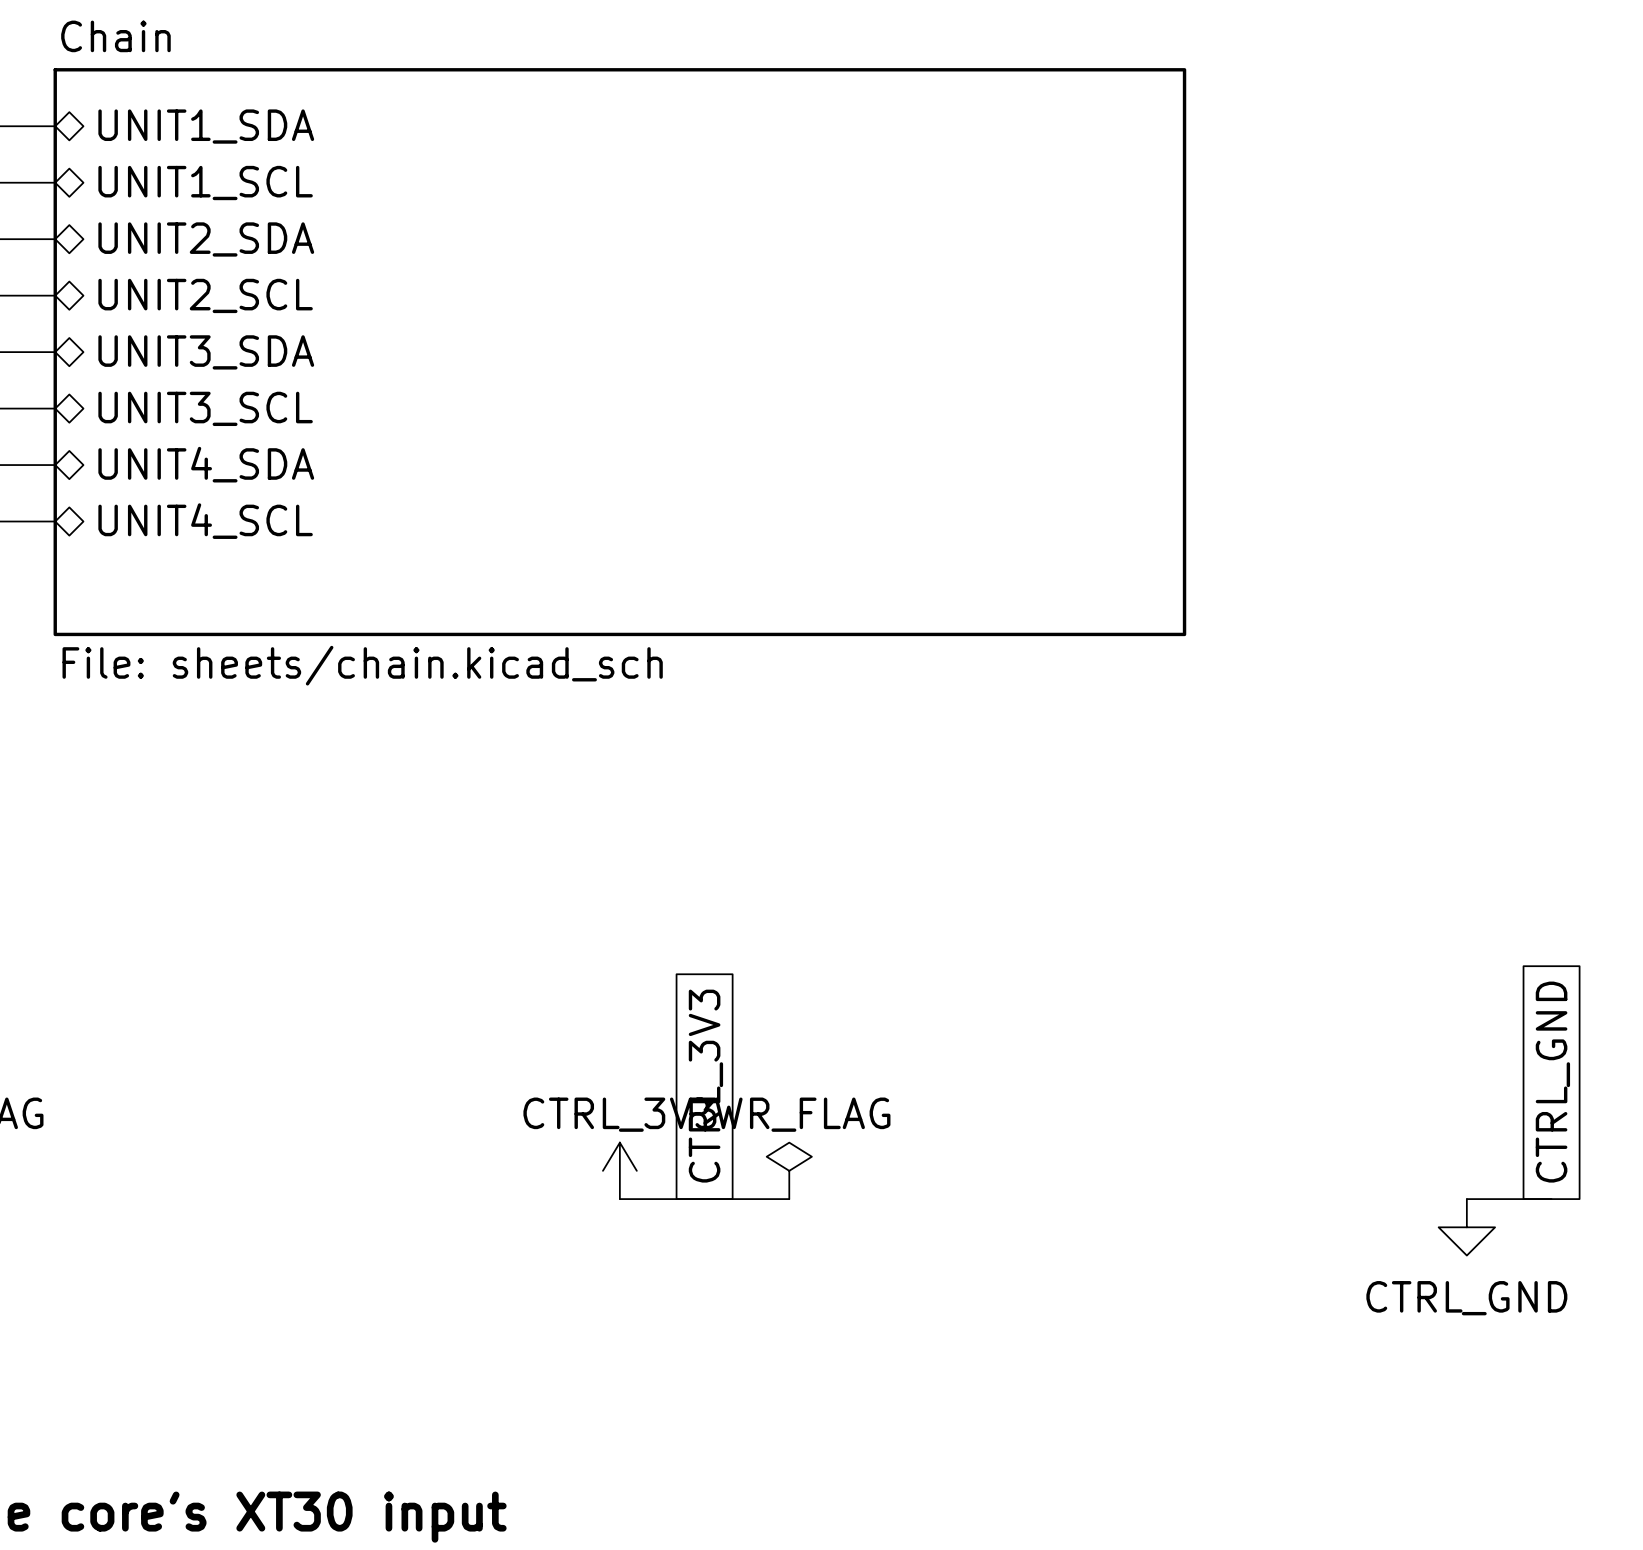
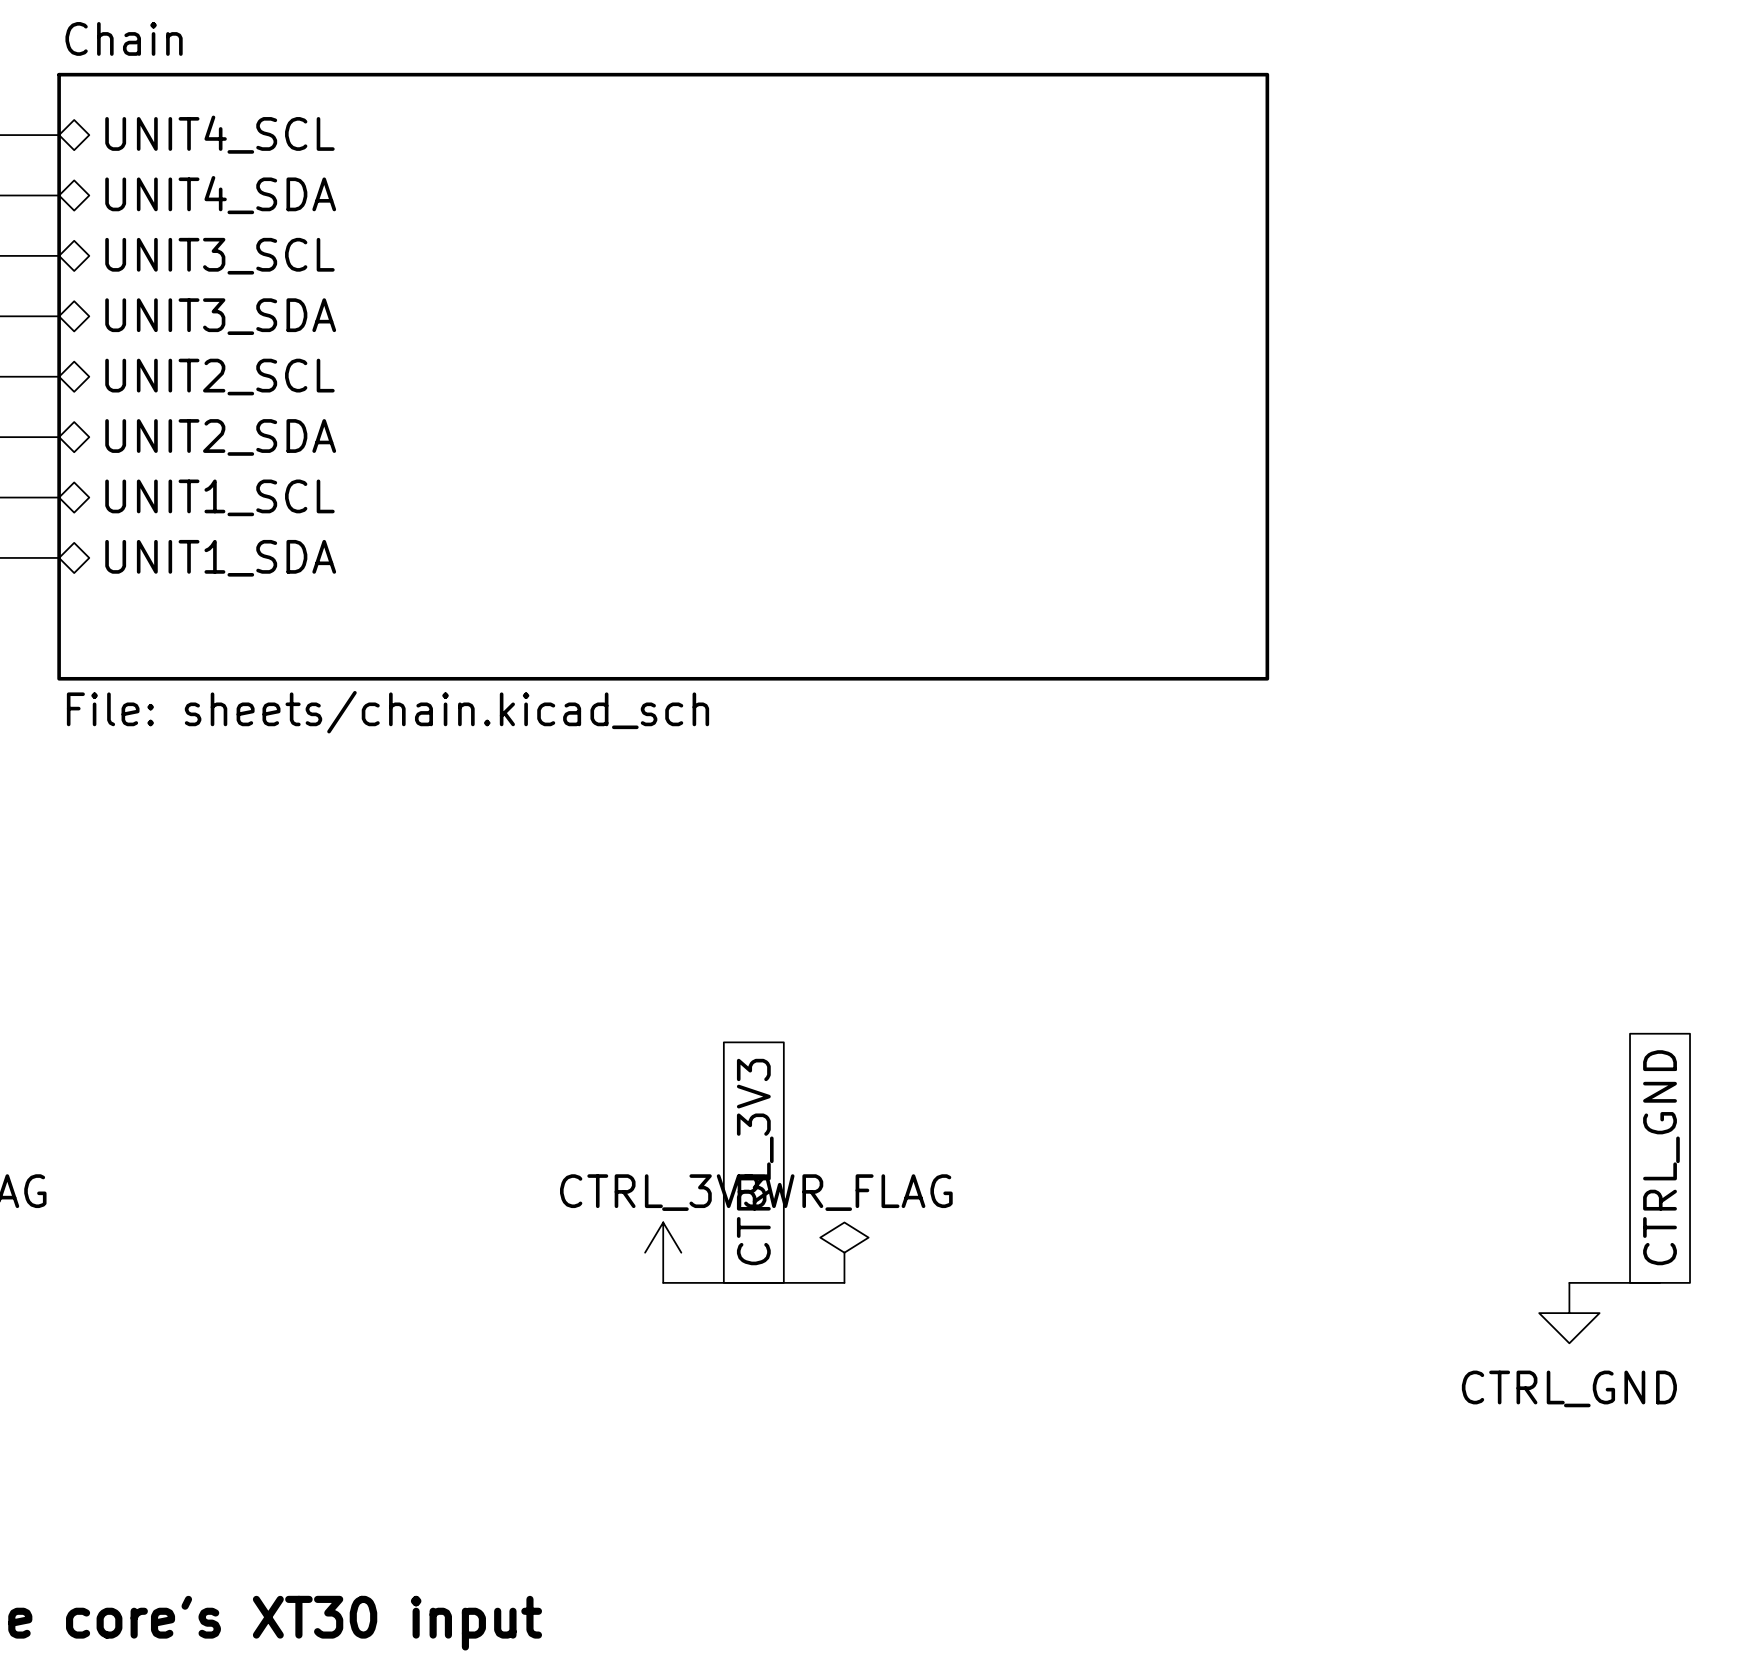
sheet pin: UNIT1_SDA (206, 126) -> UNIT4_SCL (219, 134)
sheet pin: UNIT1_SCL (205, 183) -> UNIT4_SDA (220, 195)
sheet pin: UNIT2_SDA (206, 239) -> UNIT3_SCL (219, 256)
sheet pin: UNIT2_SCL (205, 295) -> UNIT3_SDA (220, 316)
sheet pin: UNIT3_SDA (206, 352) -> UNIT2_SCL (219, 377)
sheet pin: UNIT3_SCL (205, 408) -> UNIT2_SDA (220, 437)
sheet pin: UNIT4_SDA (206, 464) -> UNIT1_SCL (219, 497)
sheet pin: UNIT4_SCL (205, 521) -> UNIT1_SDA (220, 558)

